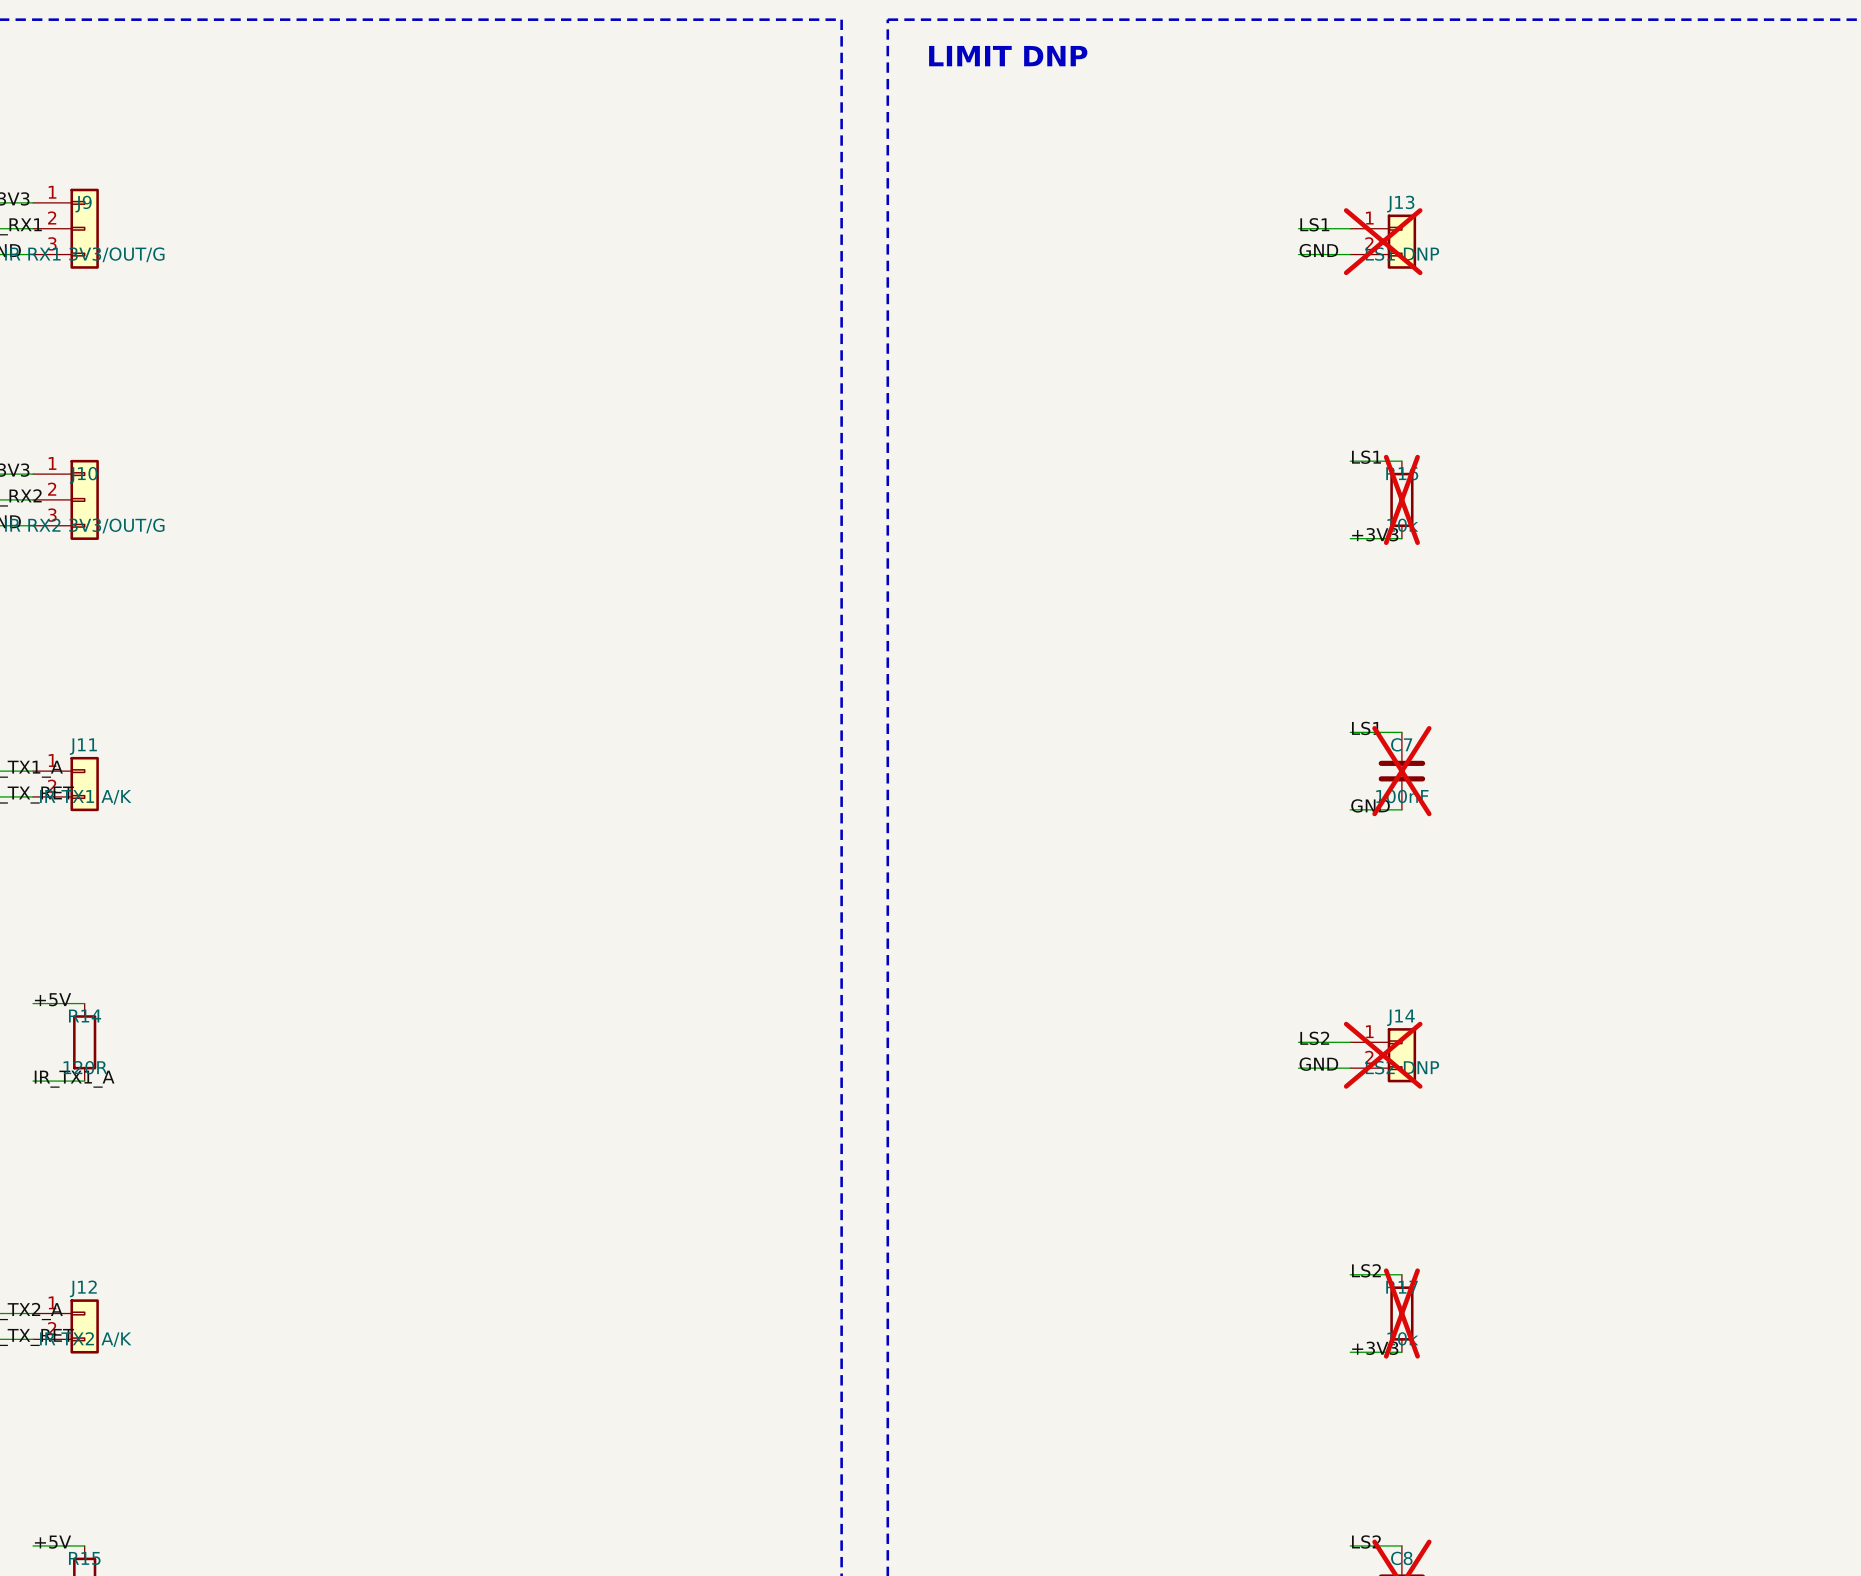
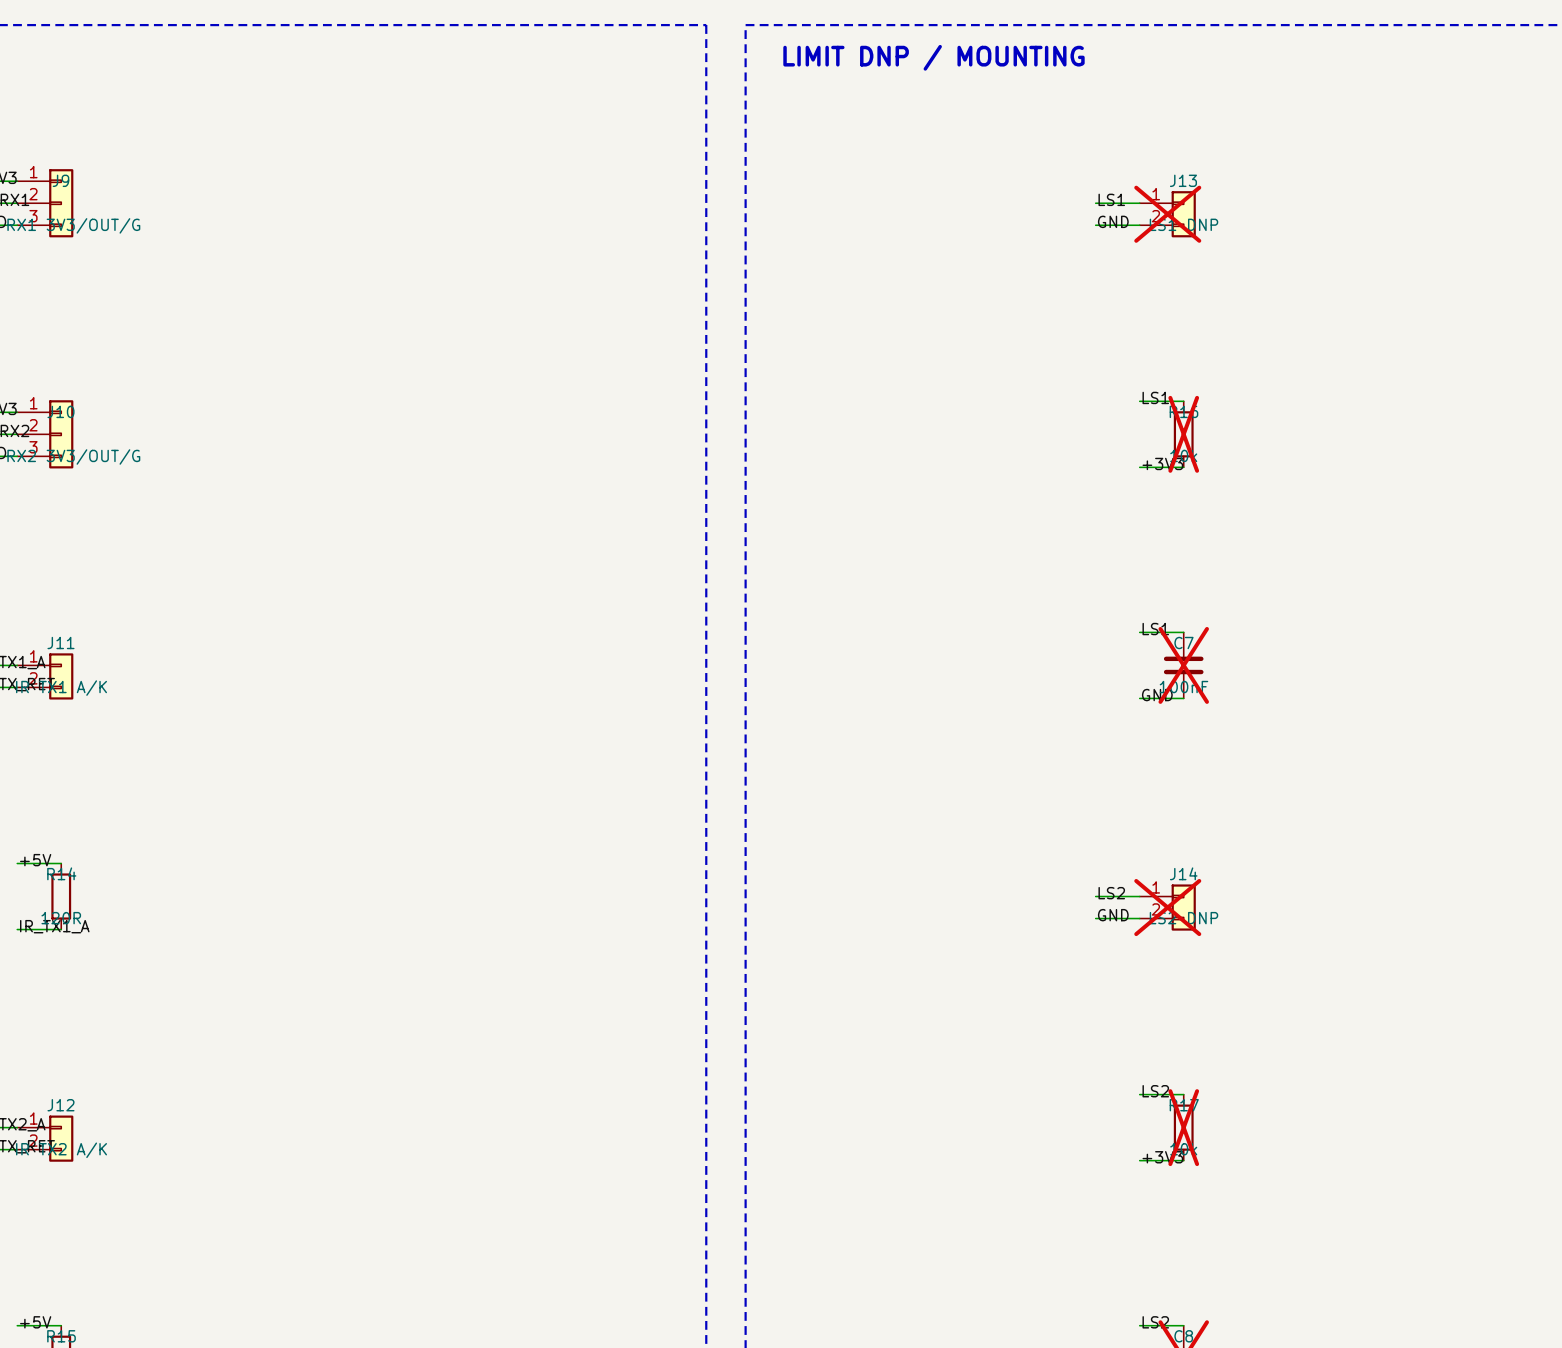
text: LIMIT DNP (1008, 56) -> LIMIT DNP / MOUNTING (933, 57)

